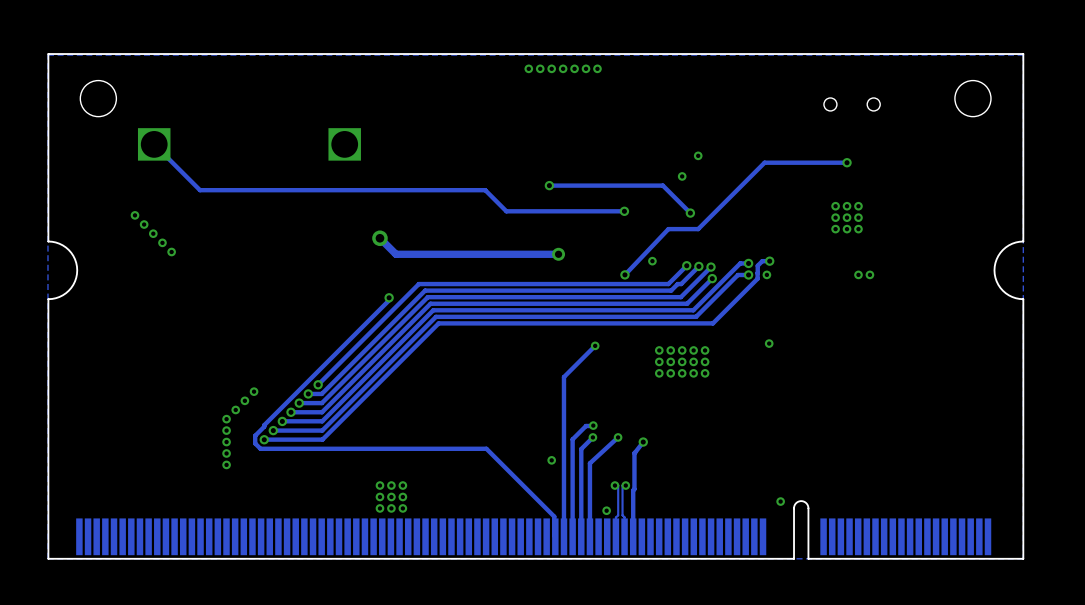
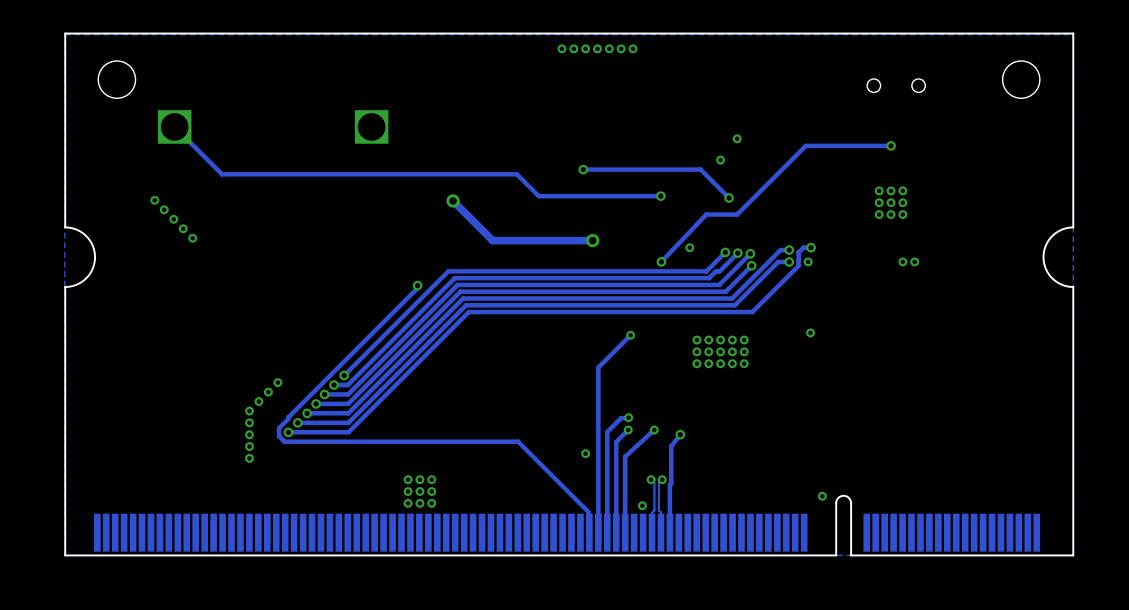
via: none -> (453, 200)
track: (379, 238) (395, 254) (461, 254) -> (453, 200) (492, 240)
via: (379, 238) -> none

